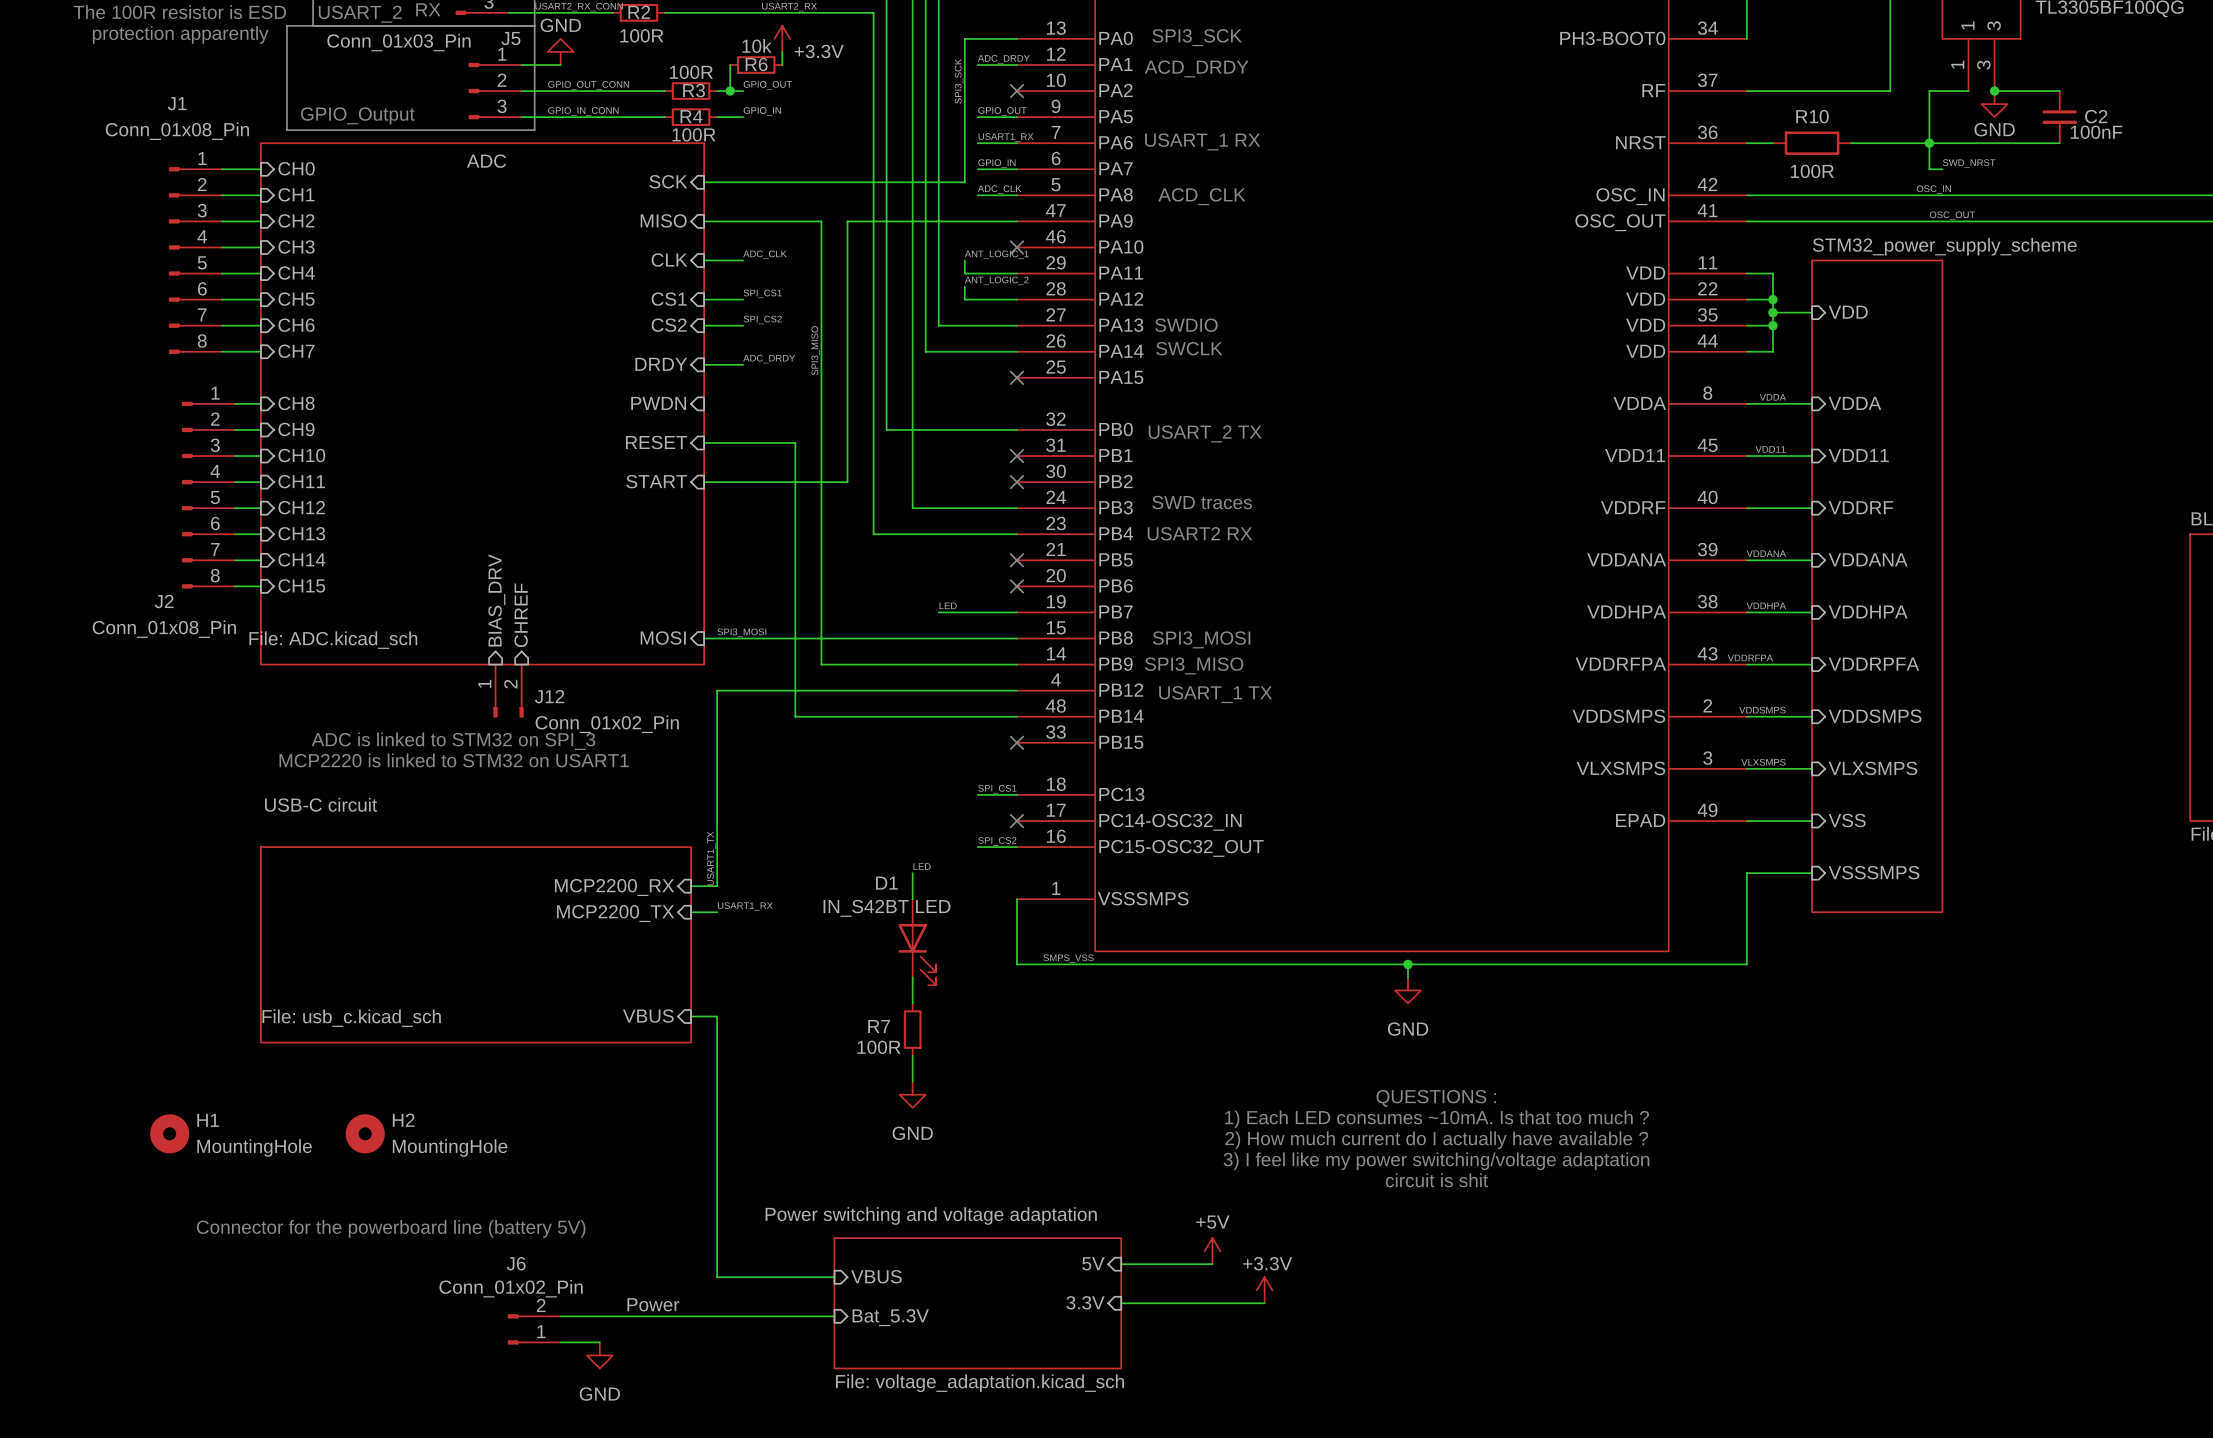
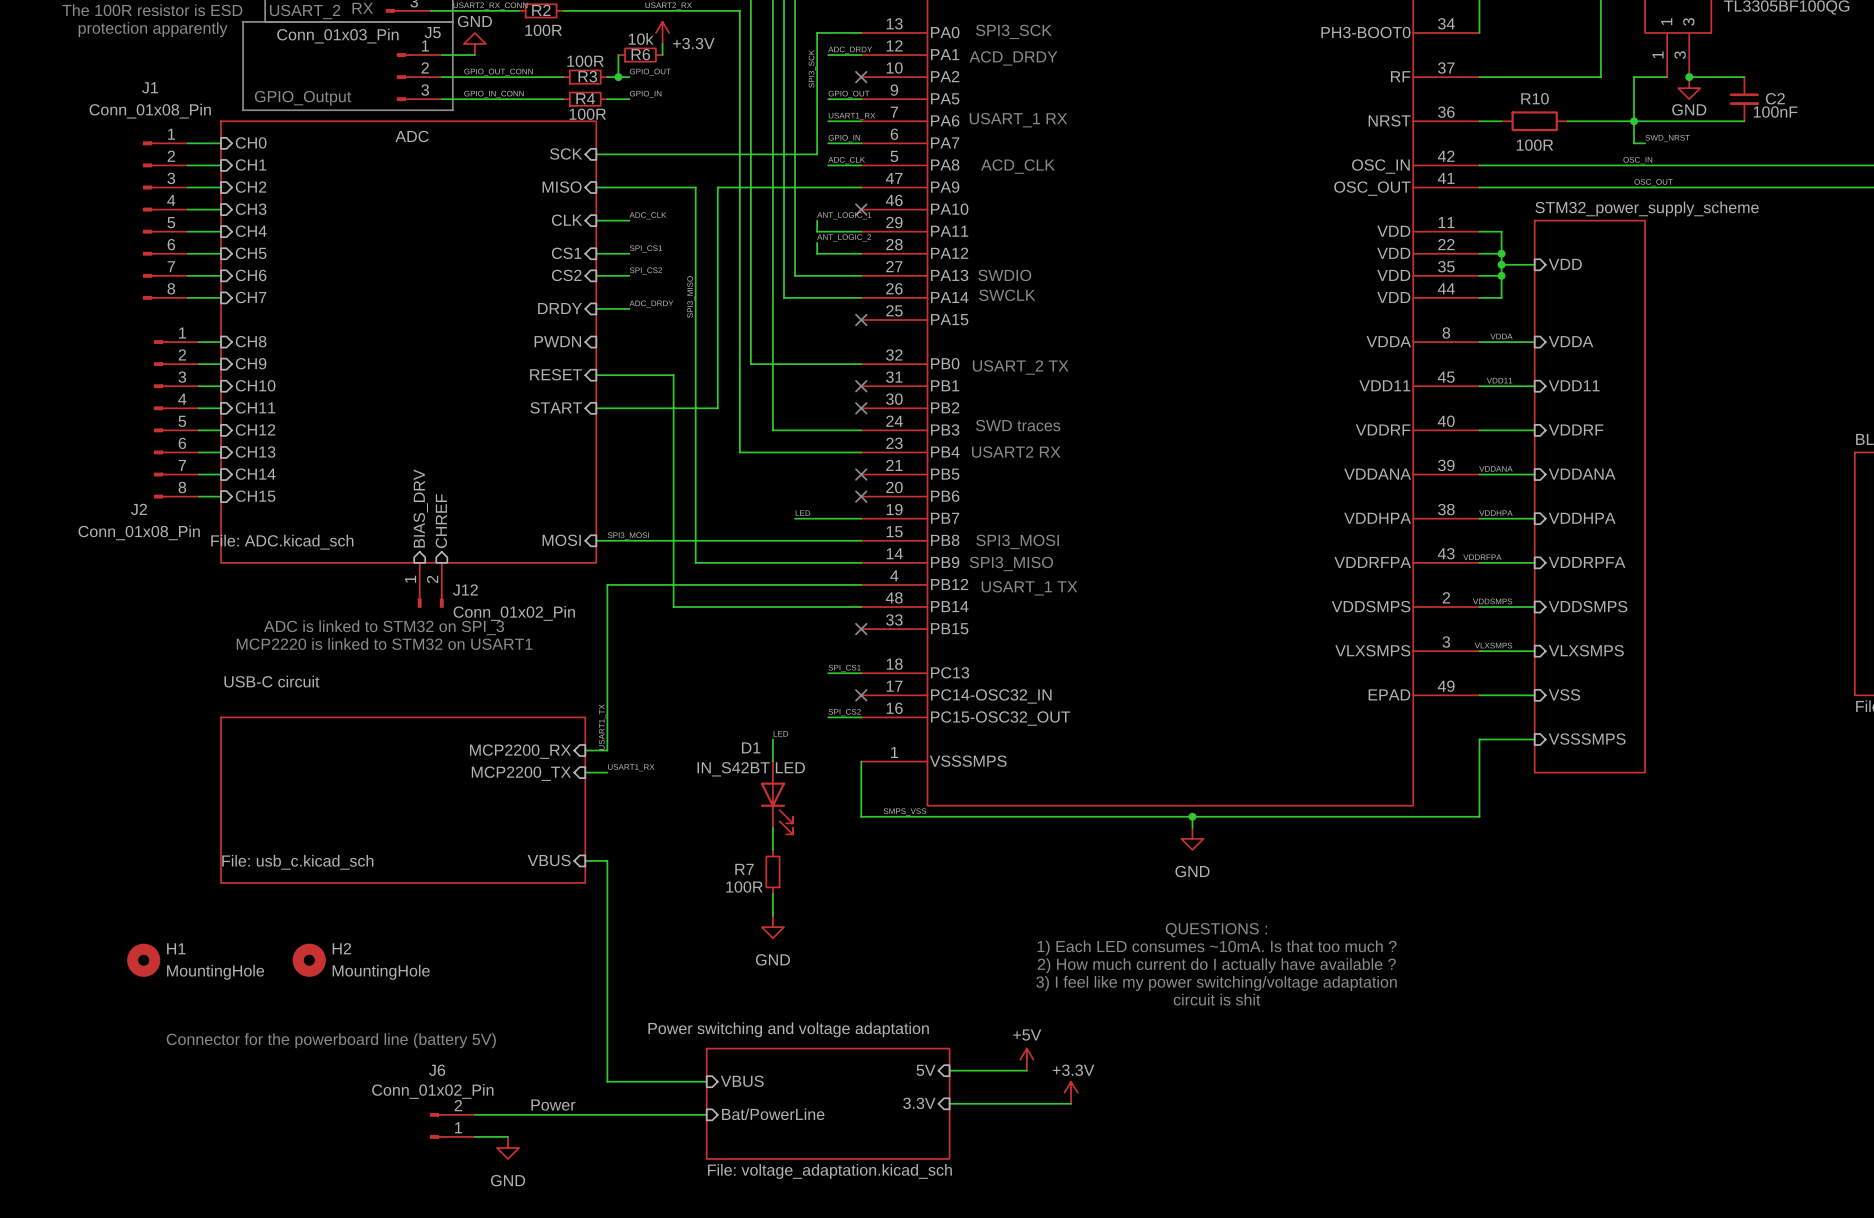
sheet pin: Bat_5.3V (890, 1317) -> Bat/PowerLine (773, 1114)

